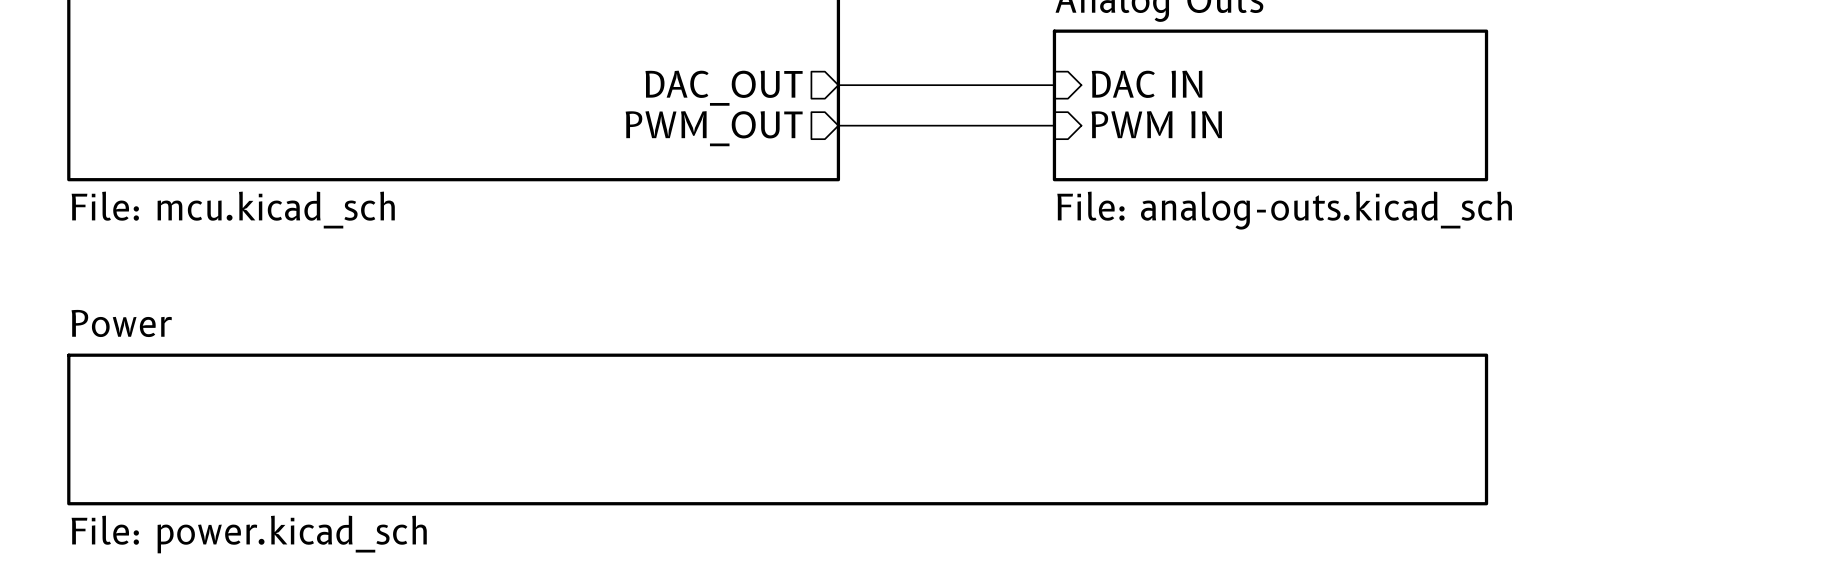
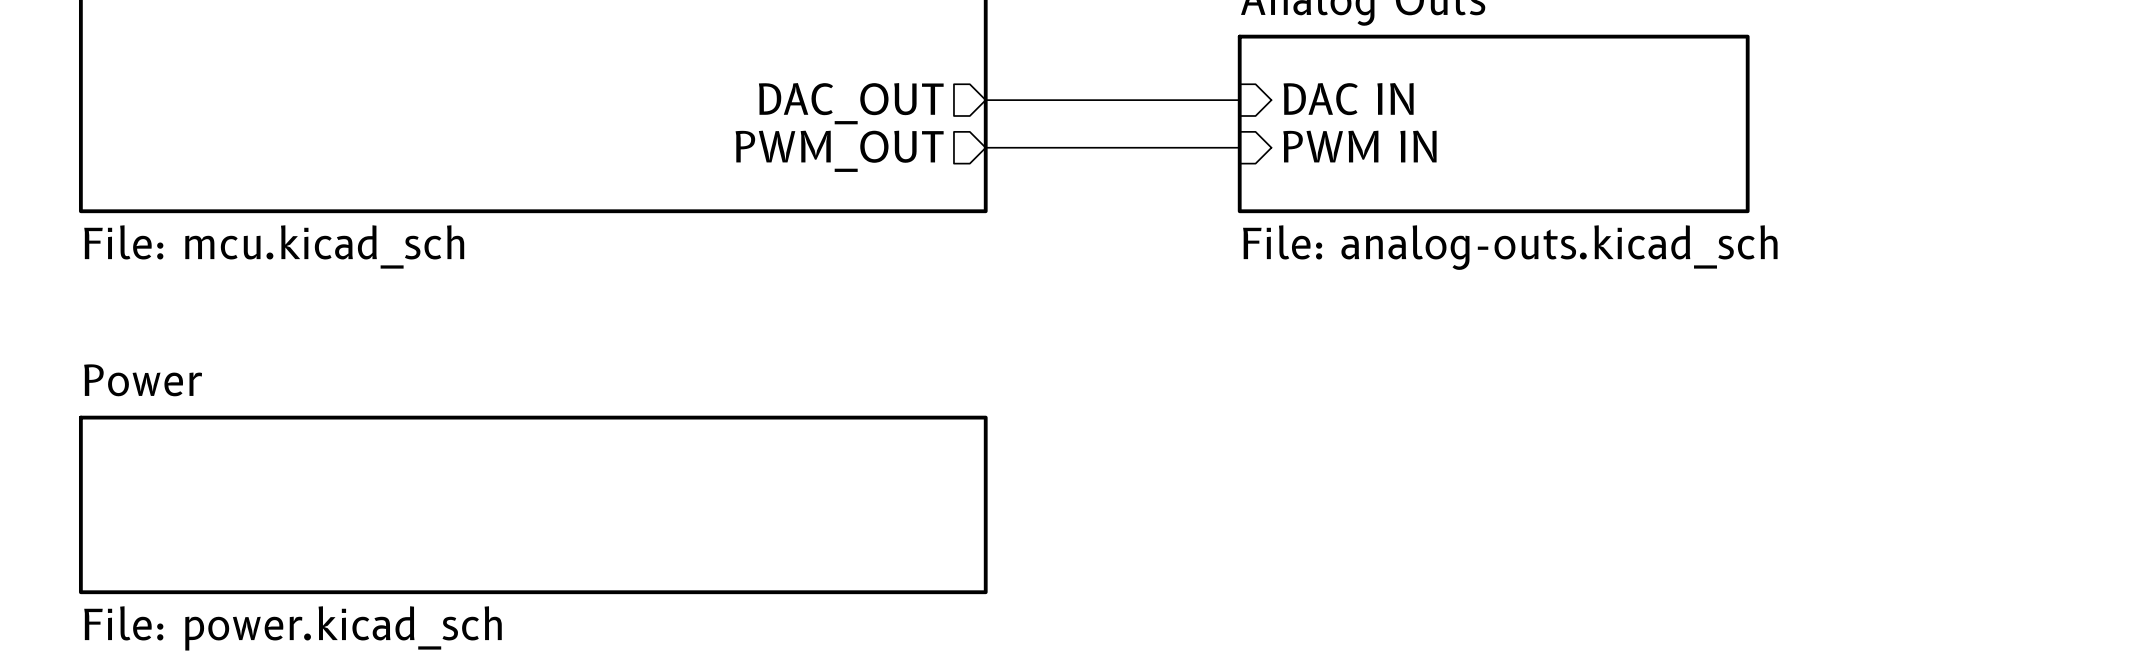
sheet Power: none -> File: power.kicad_sch (533, 504)
sheet Power: File: power.kicad_sch (777, 429) -> none

